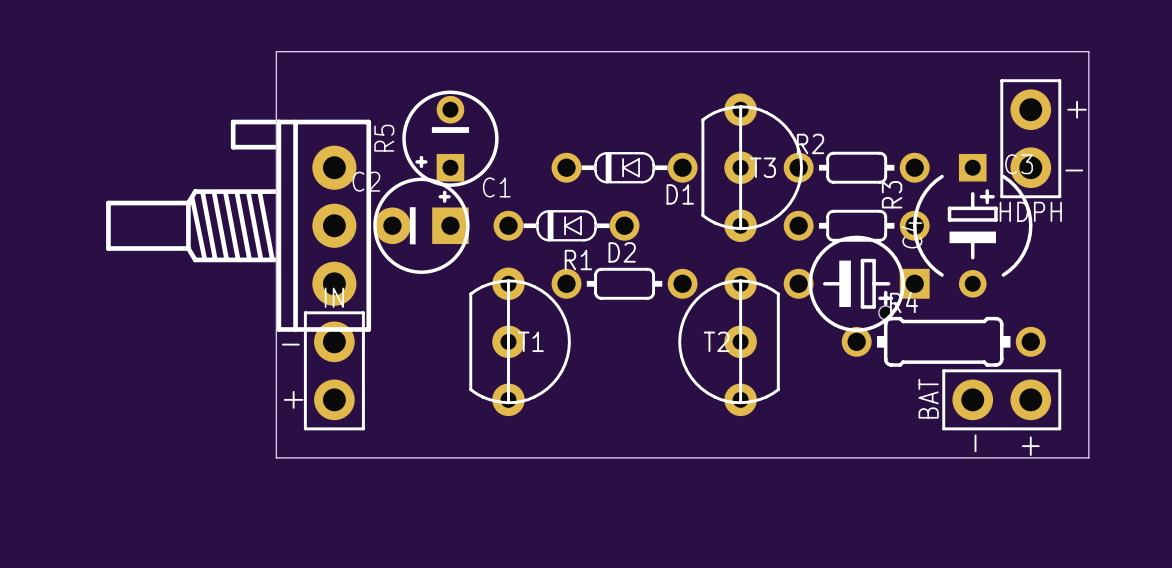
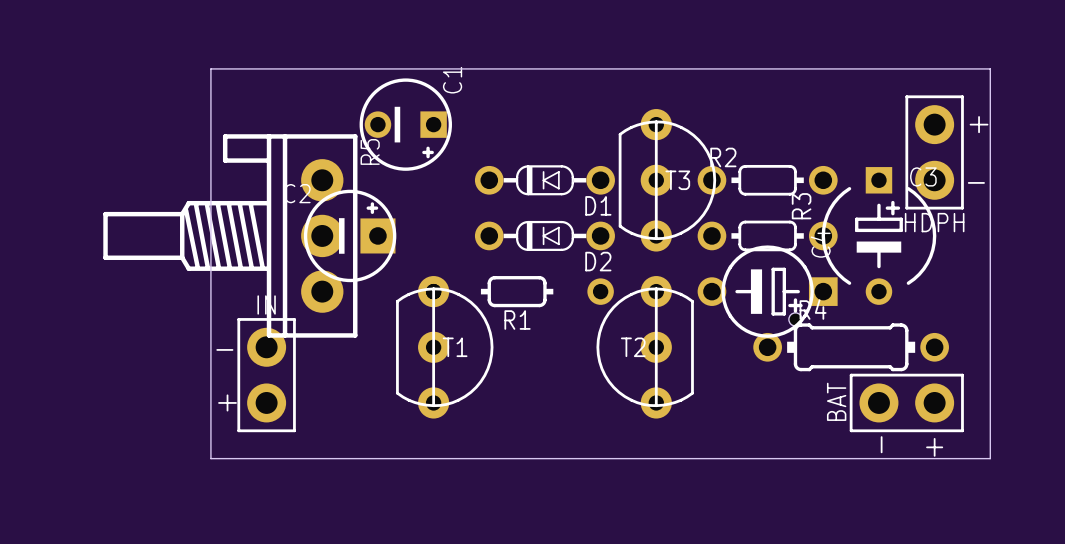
C1 rotation: 0° (450, 138) -> 90° counterclockwise (405, 124)
R5 position: (238, 225) -> (230, 235)
D2 position: (566, 225) -> (544, 235)
R1 name position: R1 (578, 260) -> R1 (517, 320)
R1 footprint: [551, 267, 698, 300] -> [420, 276, 614, 308]

